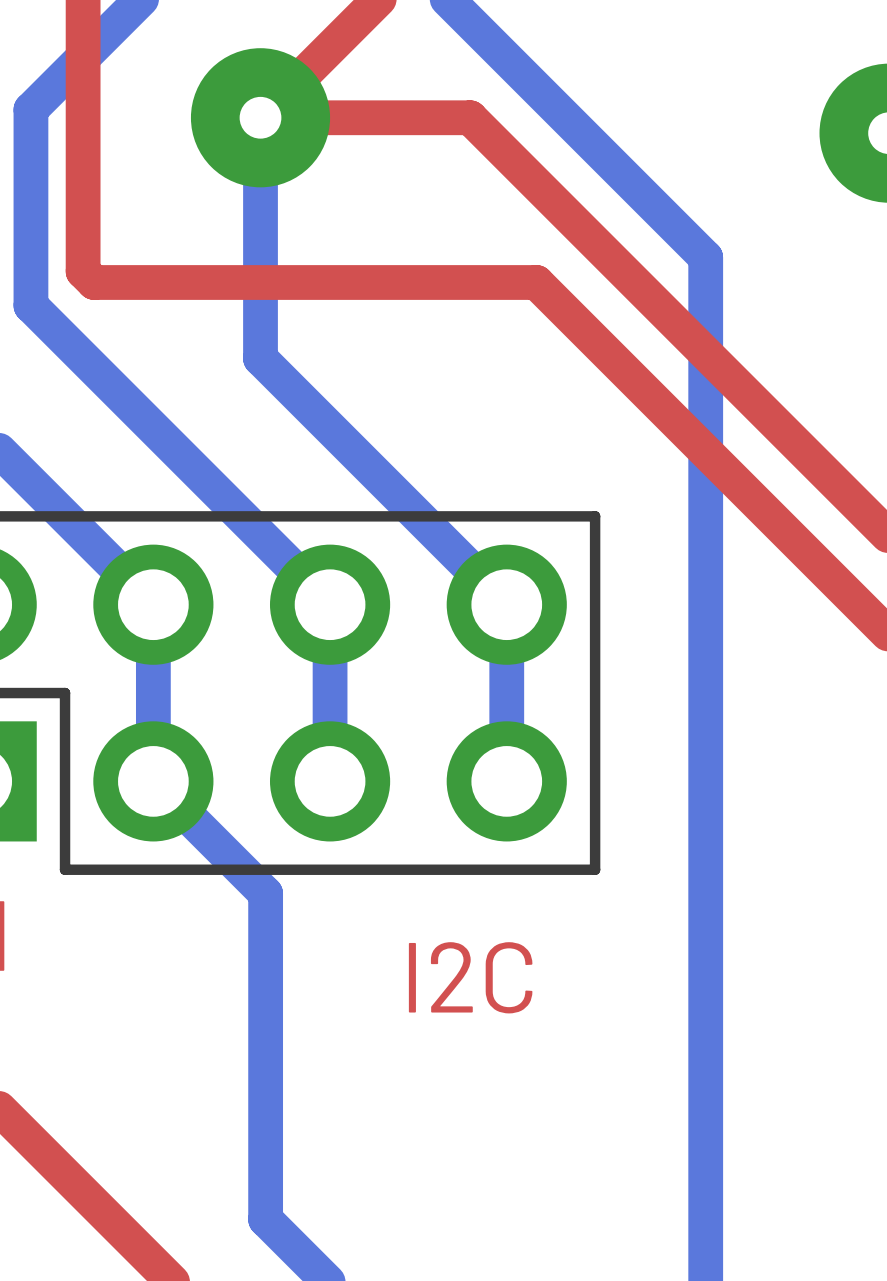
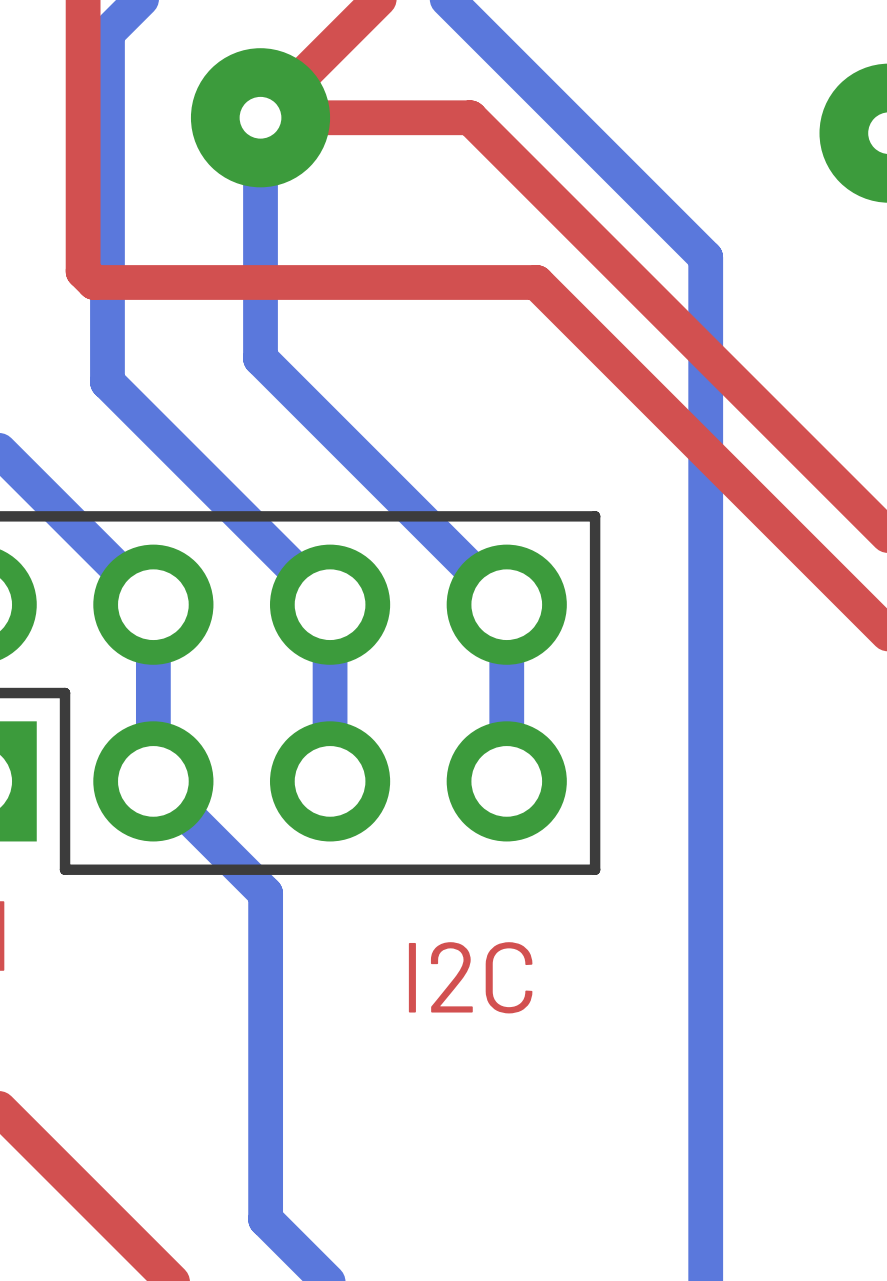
bottom track: (107, 33) (30, 109) (30, 305) (107, 382) -> (107, 33) (107, 382)

